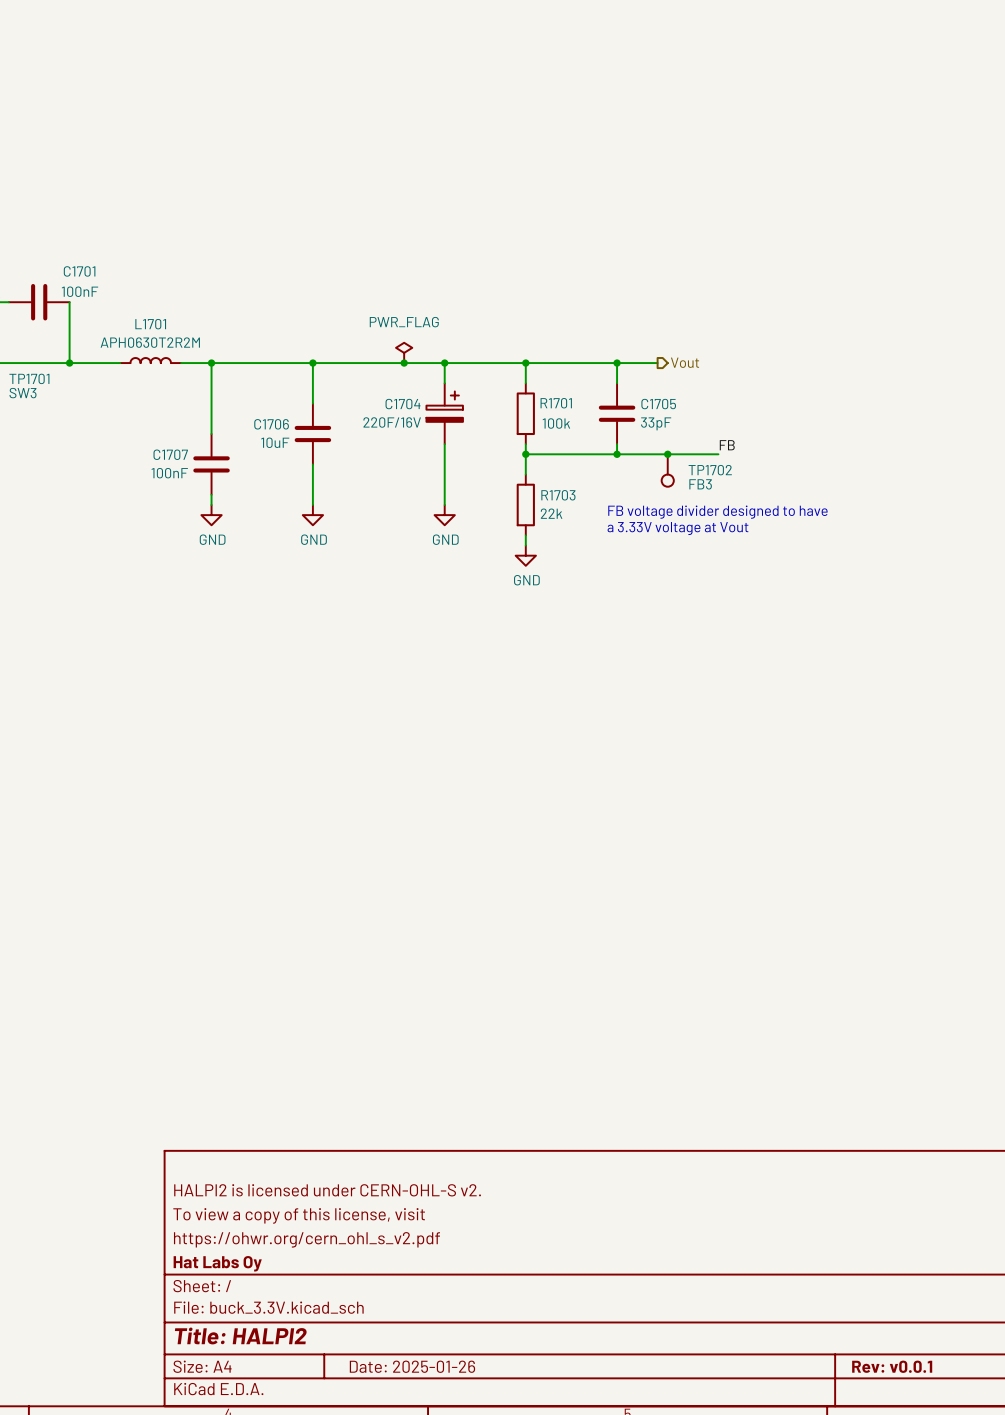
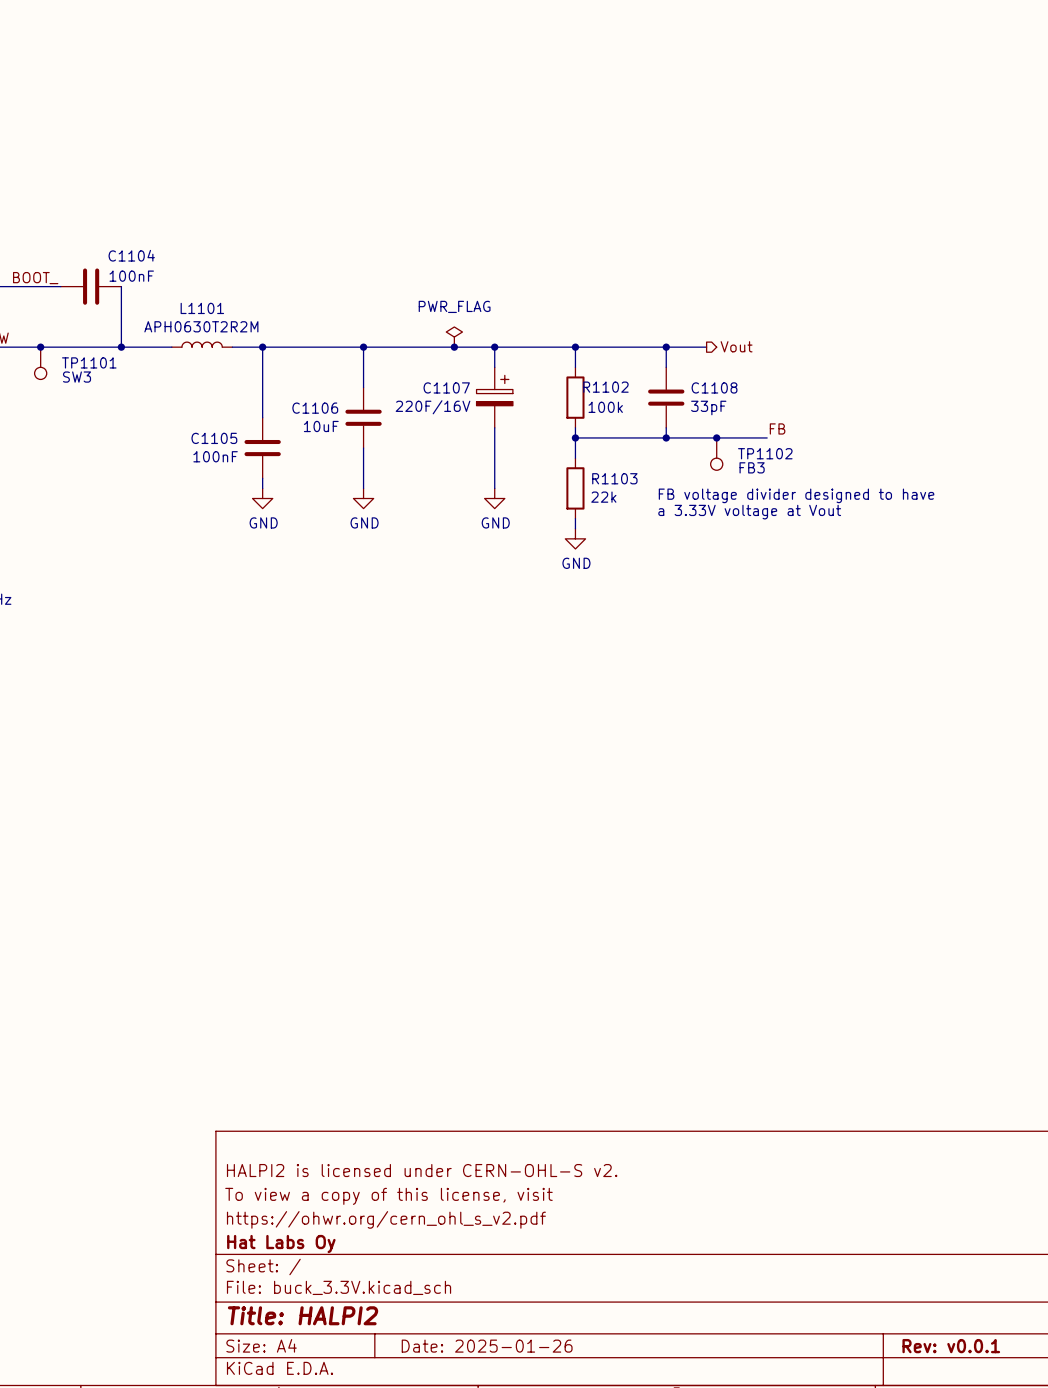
C1701 name: C1701 (79, 271) -> C1104 (131, 255)
L1701 name: L1701 (150, 324) -> L1101 (202, 308)
TP1701 name: TP1701 (29, 378) -> TP1101 (89, 362)
R1701 name: R1701 (556, 403) -> R1102 (605, 387)
C1704 name: C1704 (403, 404) -> C1107 (446, 387)
C1705 name: C1705 (658, 404) -> C1108 (714, 387)
C1706 name: C1706 (271, 424) -> C1106 (315, 408)
C1707 name: C1707 (170, 454) -> C1105 (214, 438)
TP1702 name: TP1702 (710, 470) -> TP1102 (765, 453)
R1703 name: R1703 (558, 495) -> R1103 (614, 478)

